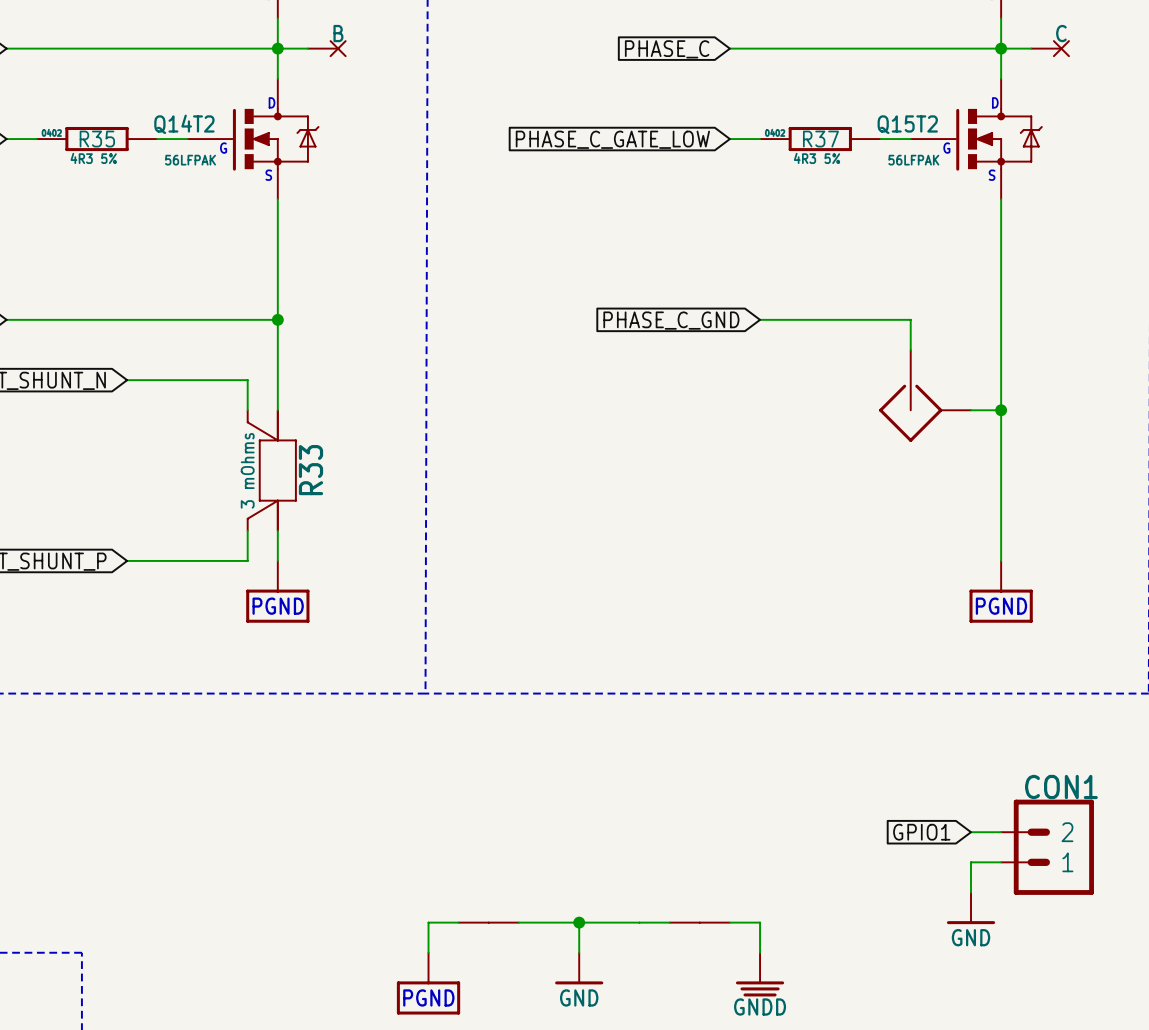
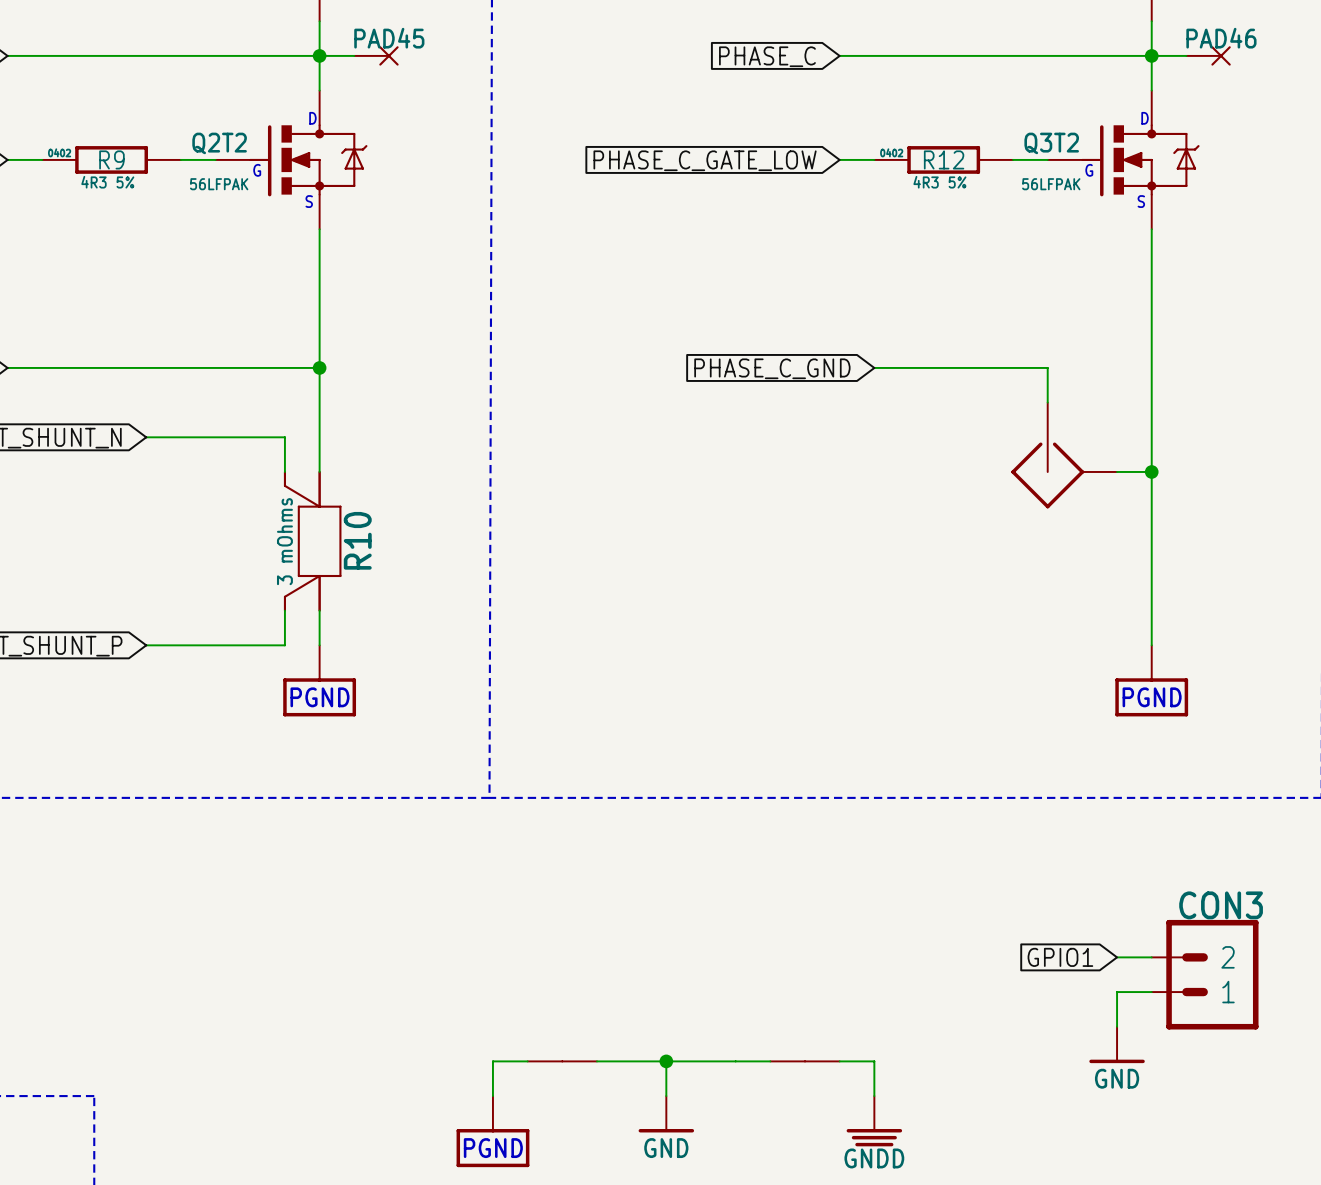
B name: B (338, 33) -> PAD45 (389, 38)
C name: C (1061, 33) -> PAD46 (1221, 38)
Q14T2 name: Q14T2 (184, 124) -> Q2T2 (219, 143)
Q15T2 name: Q15T2 (907, 124) -> Q3T2 (1051, 143)
R35 name: R35 (97, 139) -> R9 (111, 159)
R37 name: R37 (820, 139) -> R12 (944, 159)
R33 name: R33 (310, 470) -> R10 (357, 540)
CON1 name: CON1 (1061, 787) -> CON3 (1221, 905)

